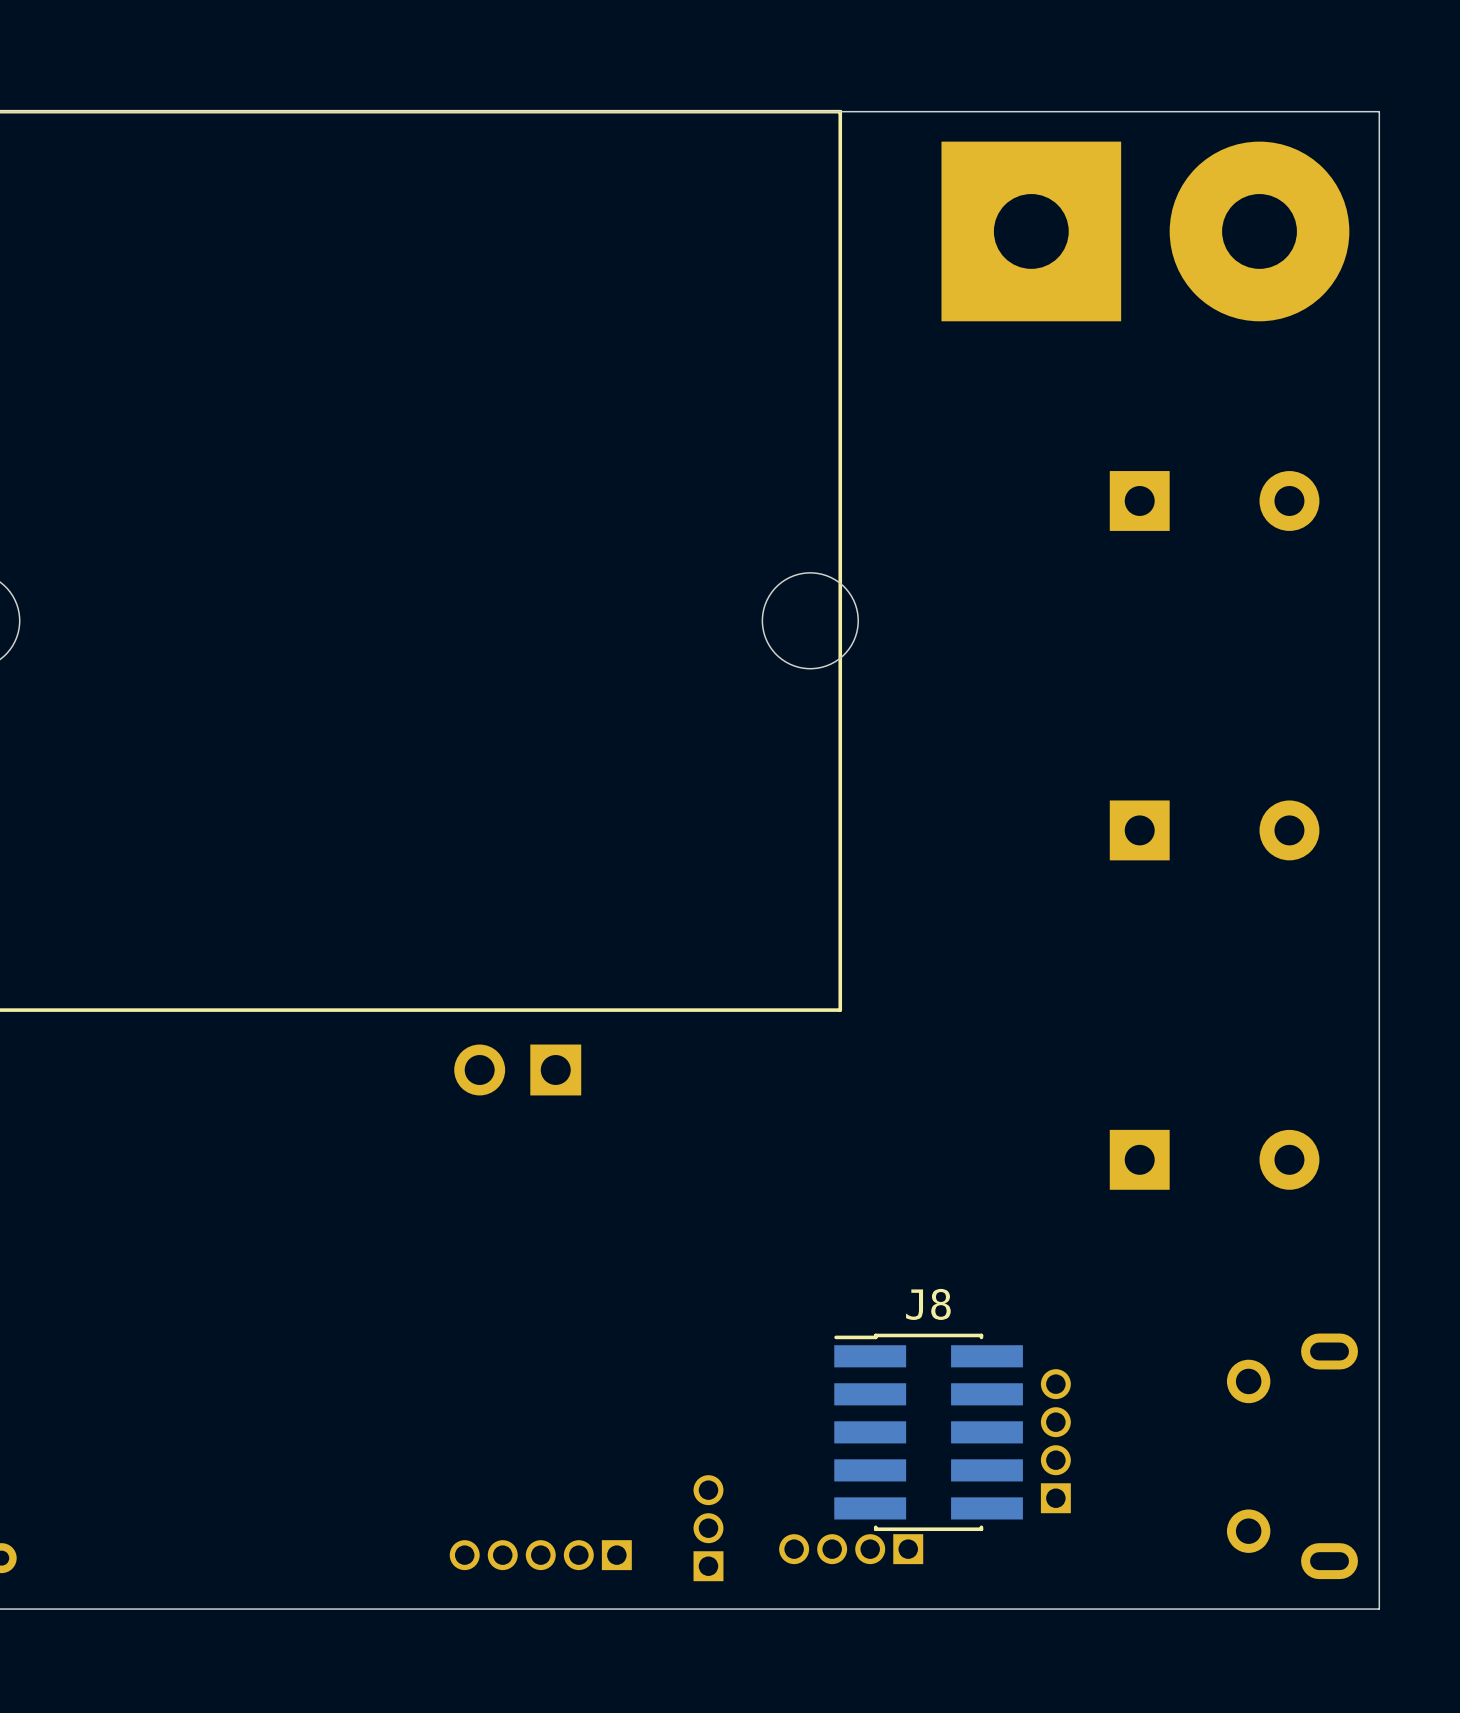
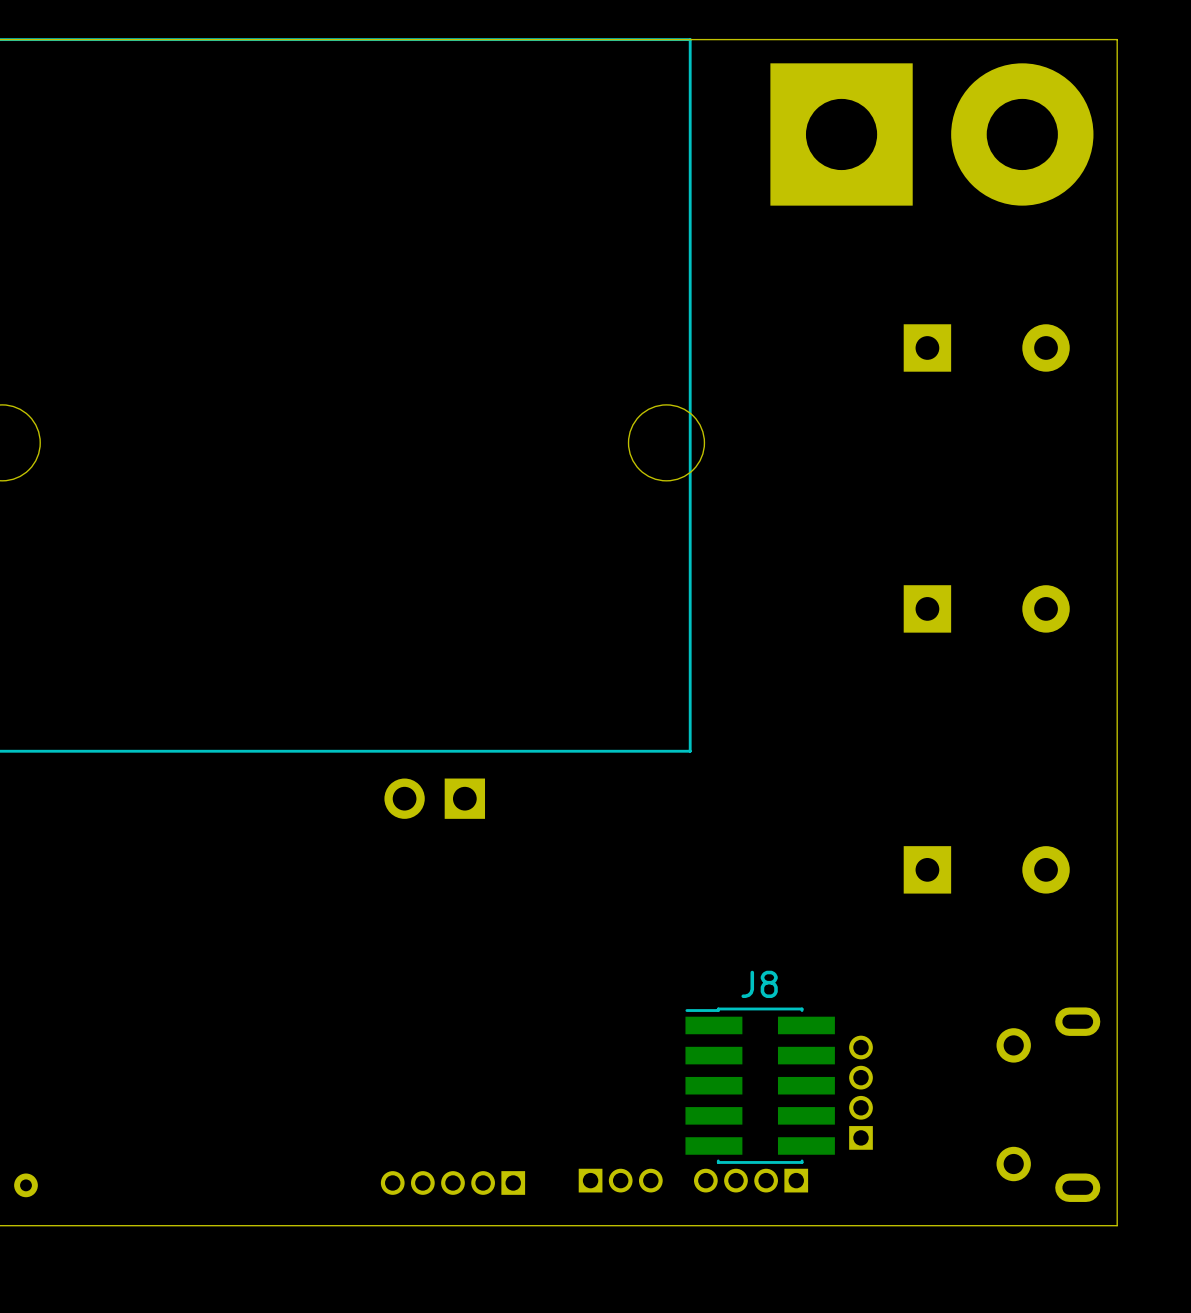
part footprint: [941, 141, 1350, 322] -> [770, 63, 1094, 206]
part rotation: 0° (708, 1528) -> 90° clockwise (620, 1180)
part position: (851, 1549) -> (751, 1180)

